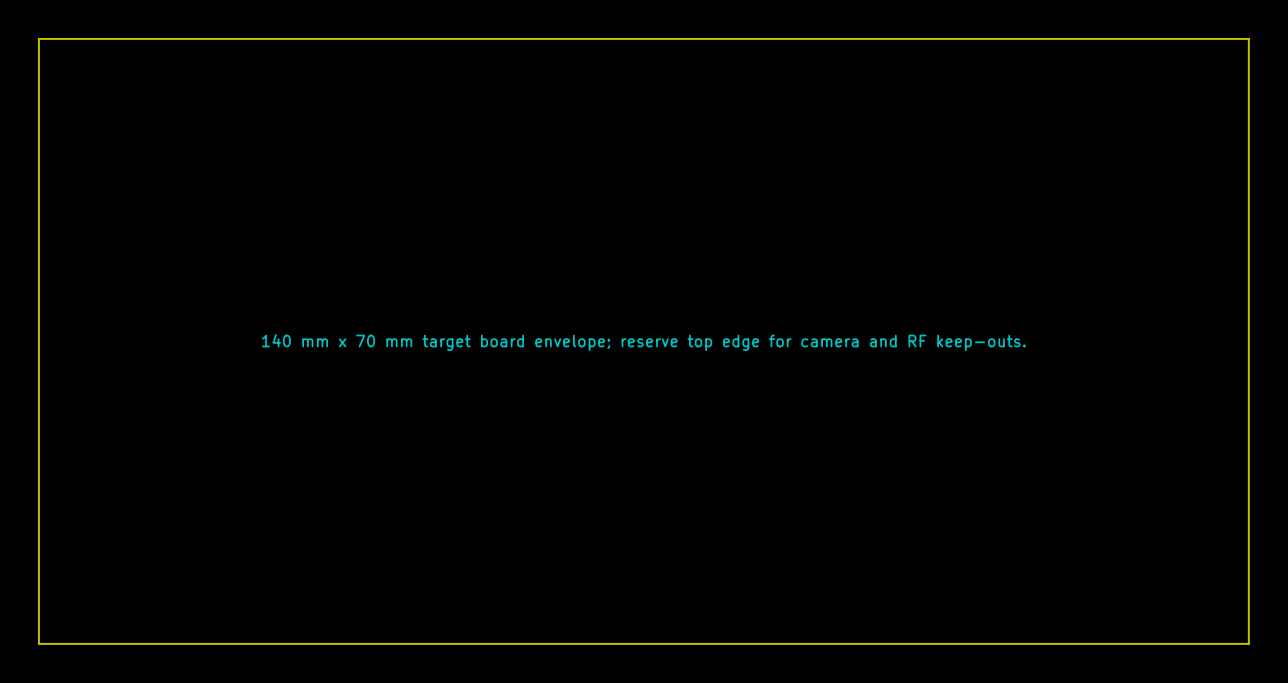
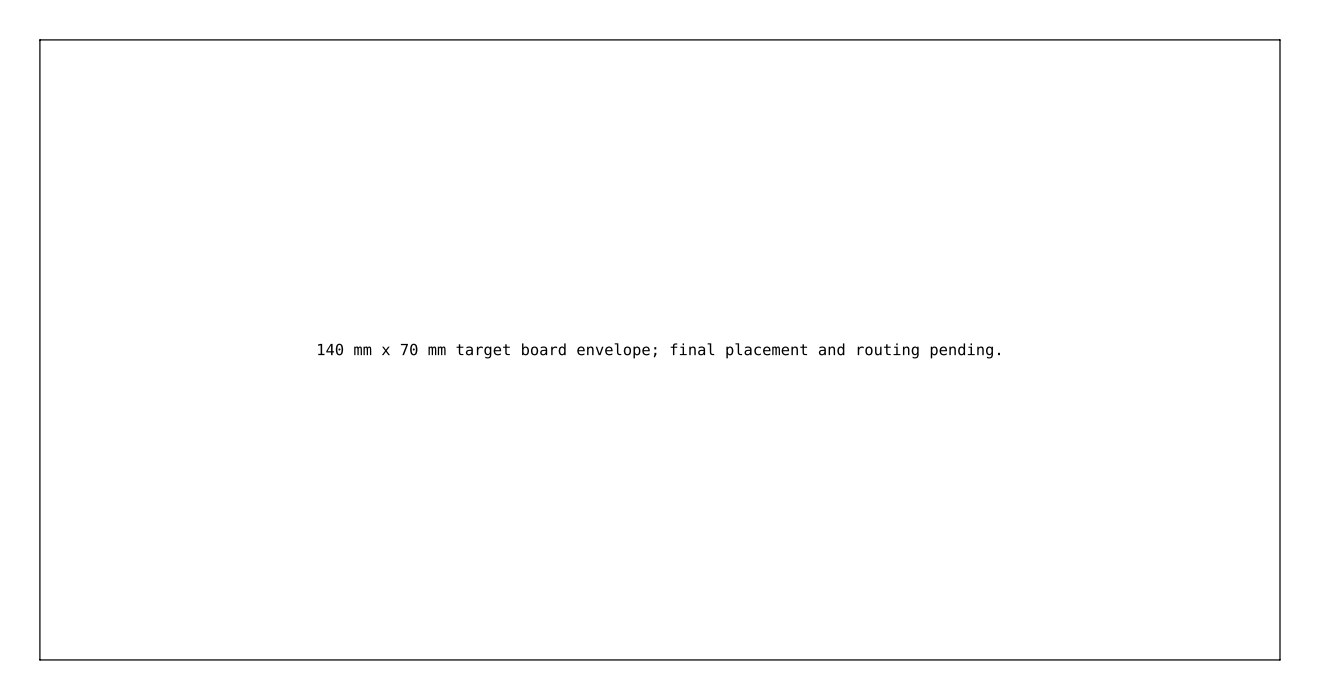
text: 140 mm x 70 mm target board envelope; reserve top edge for camera and RF keep-outs. (643, 342) -> 140 mm x 70 mm target board envelope; final placement and routing pending. (659, 350)

